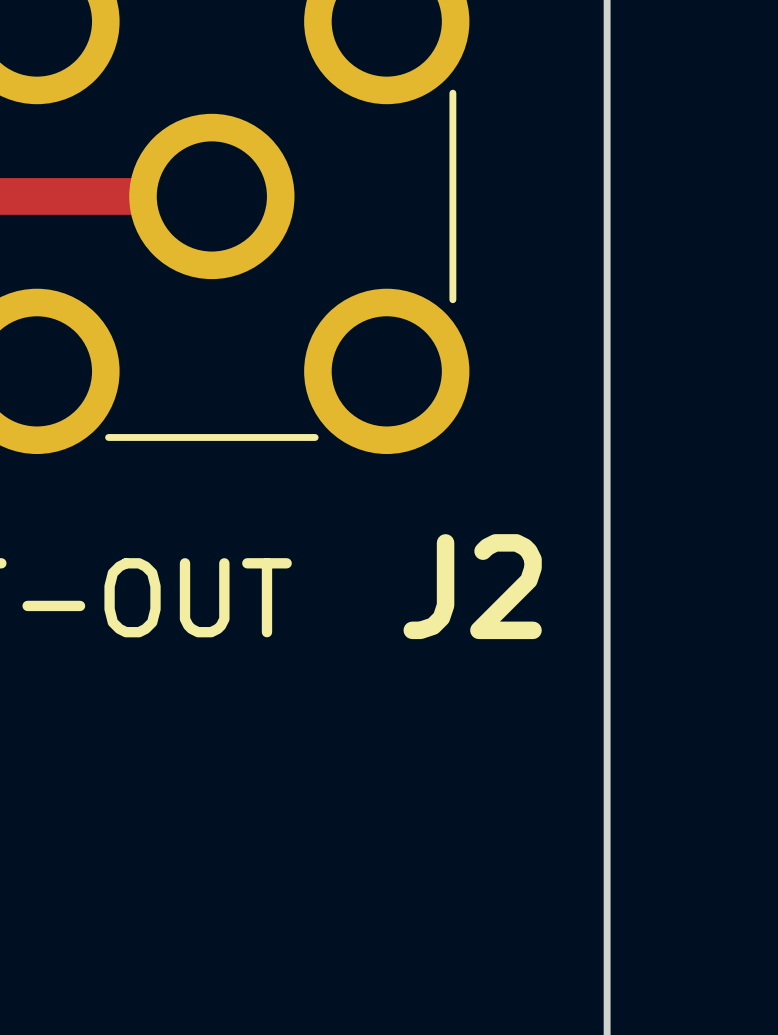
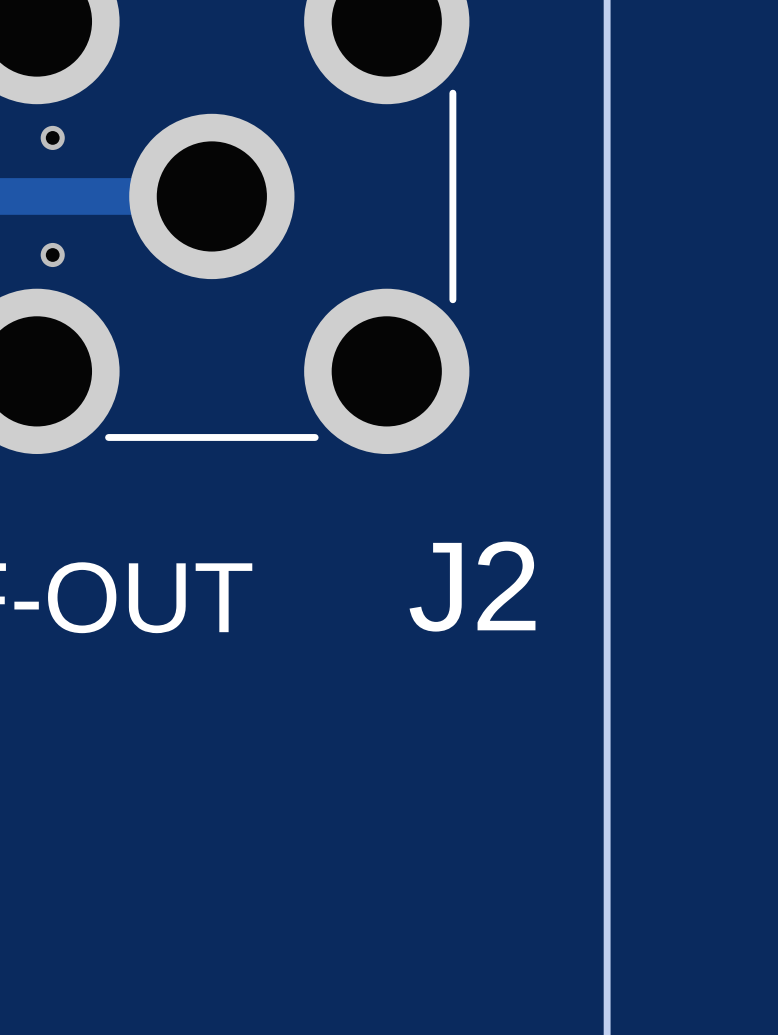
via: none -> (52, 137)
via: none -> (52, 254)

